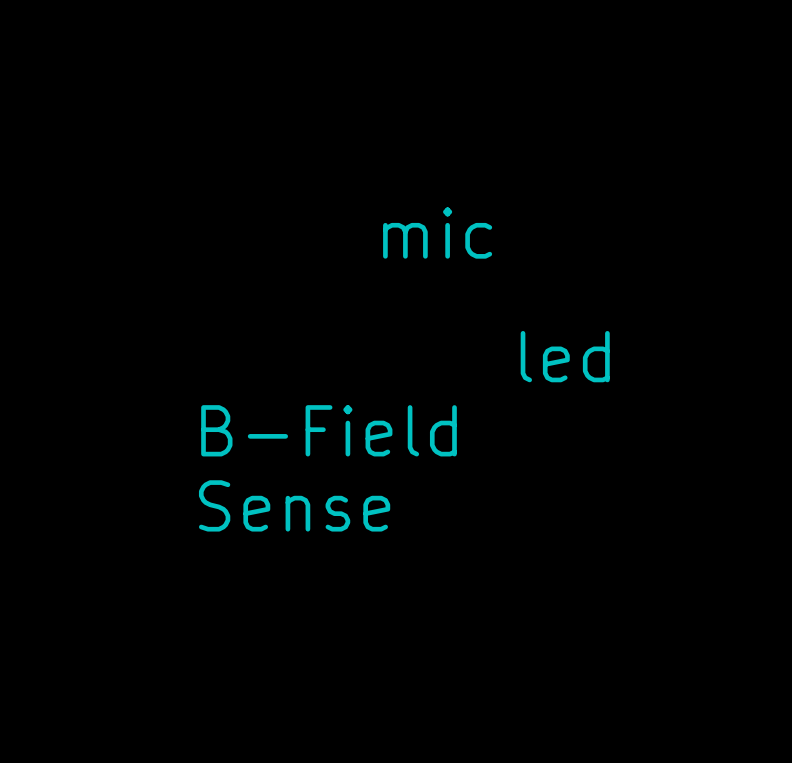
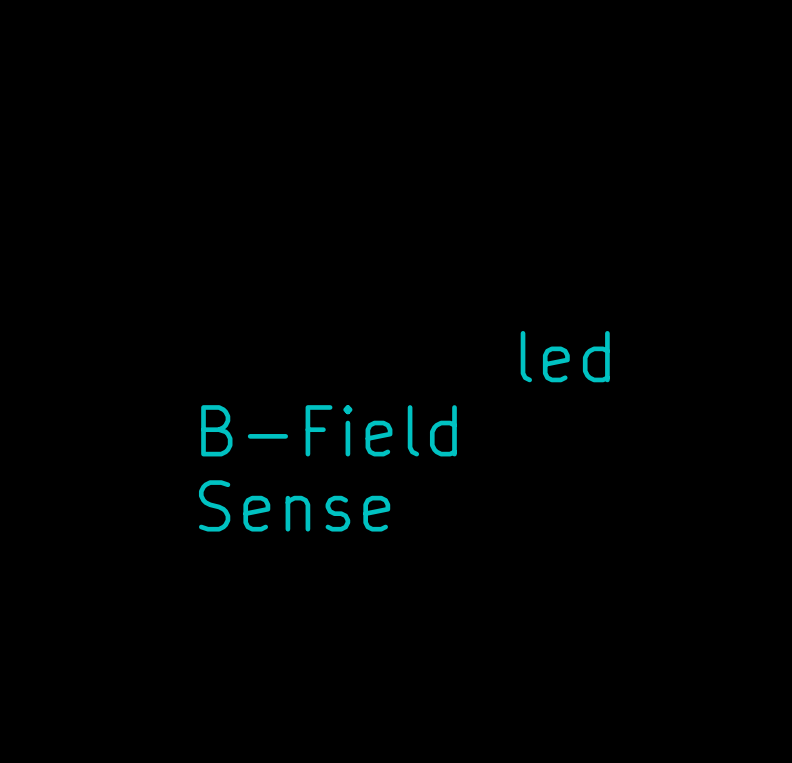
text: mic (437, 233) -> none

